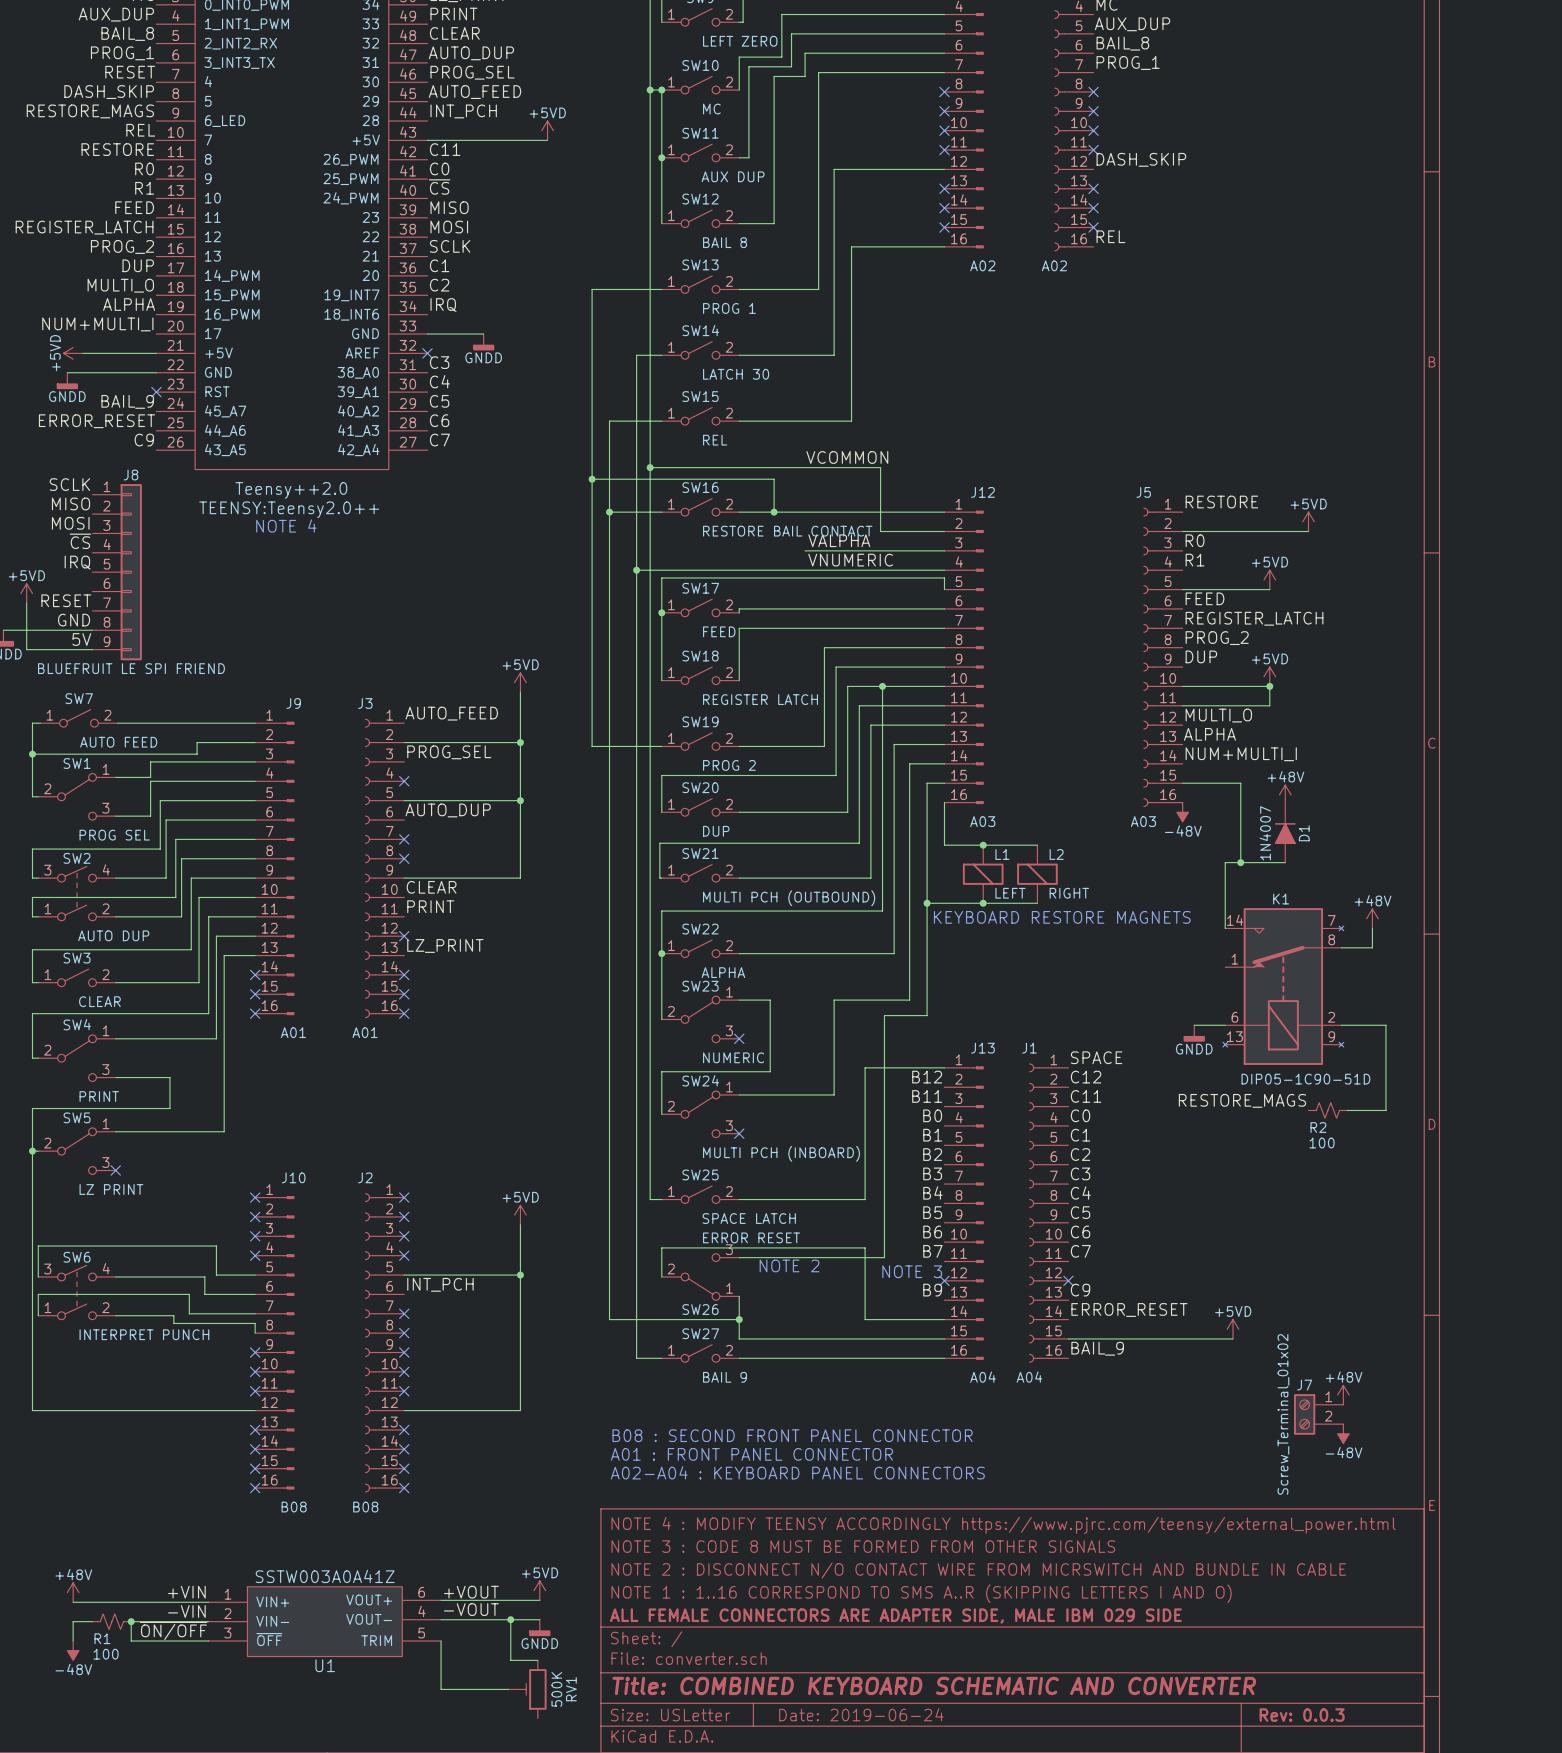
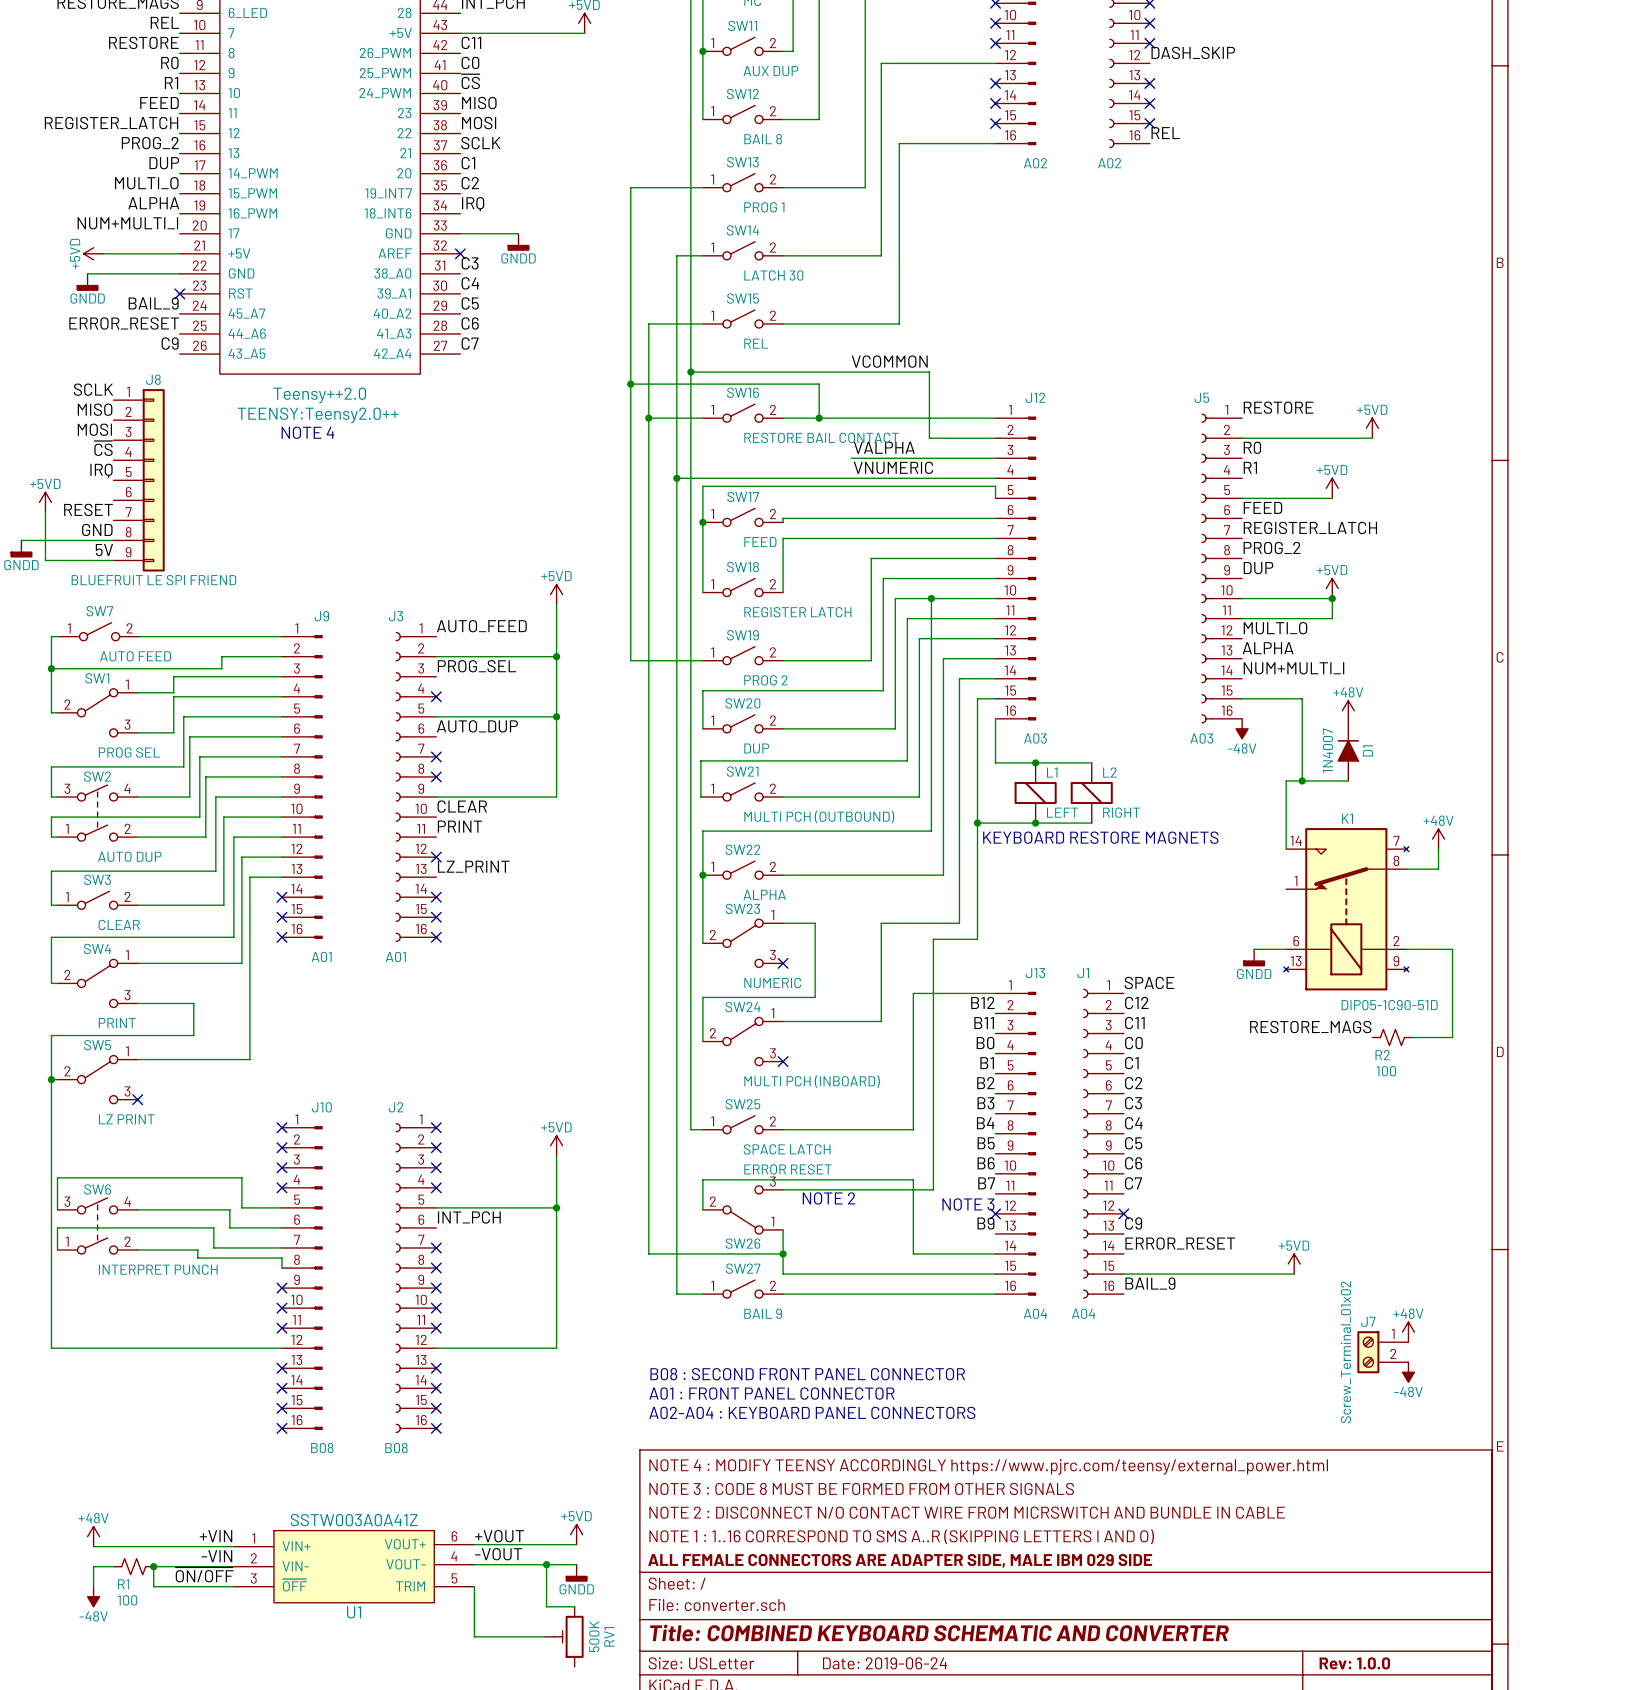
title block: Rev: 0.0.3 (1302, 1715) -> Rev: 1.0.0 (1354, 1663)

